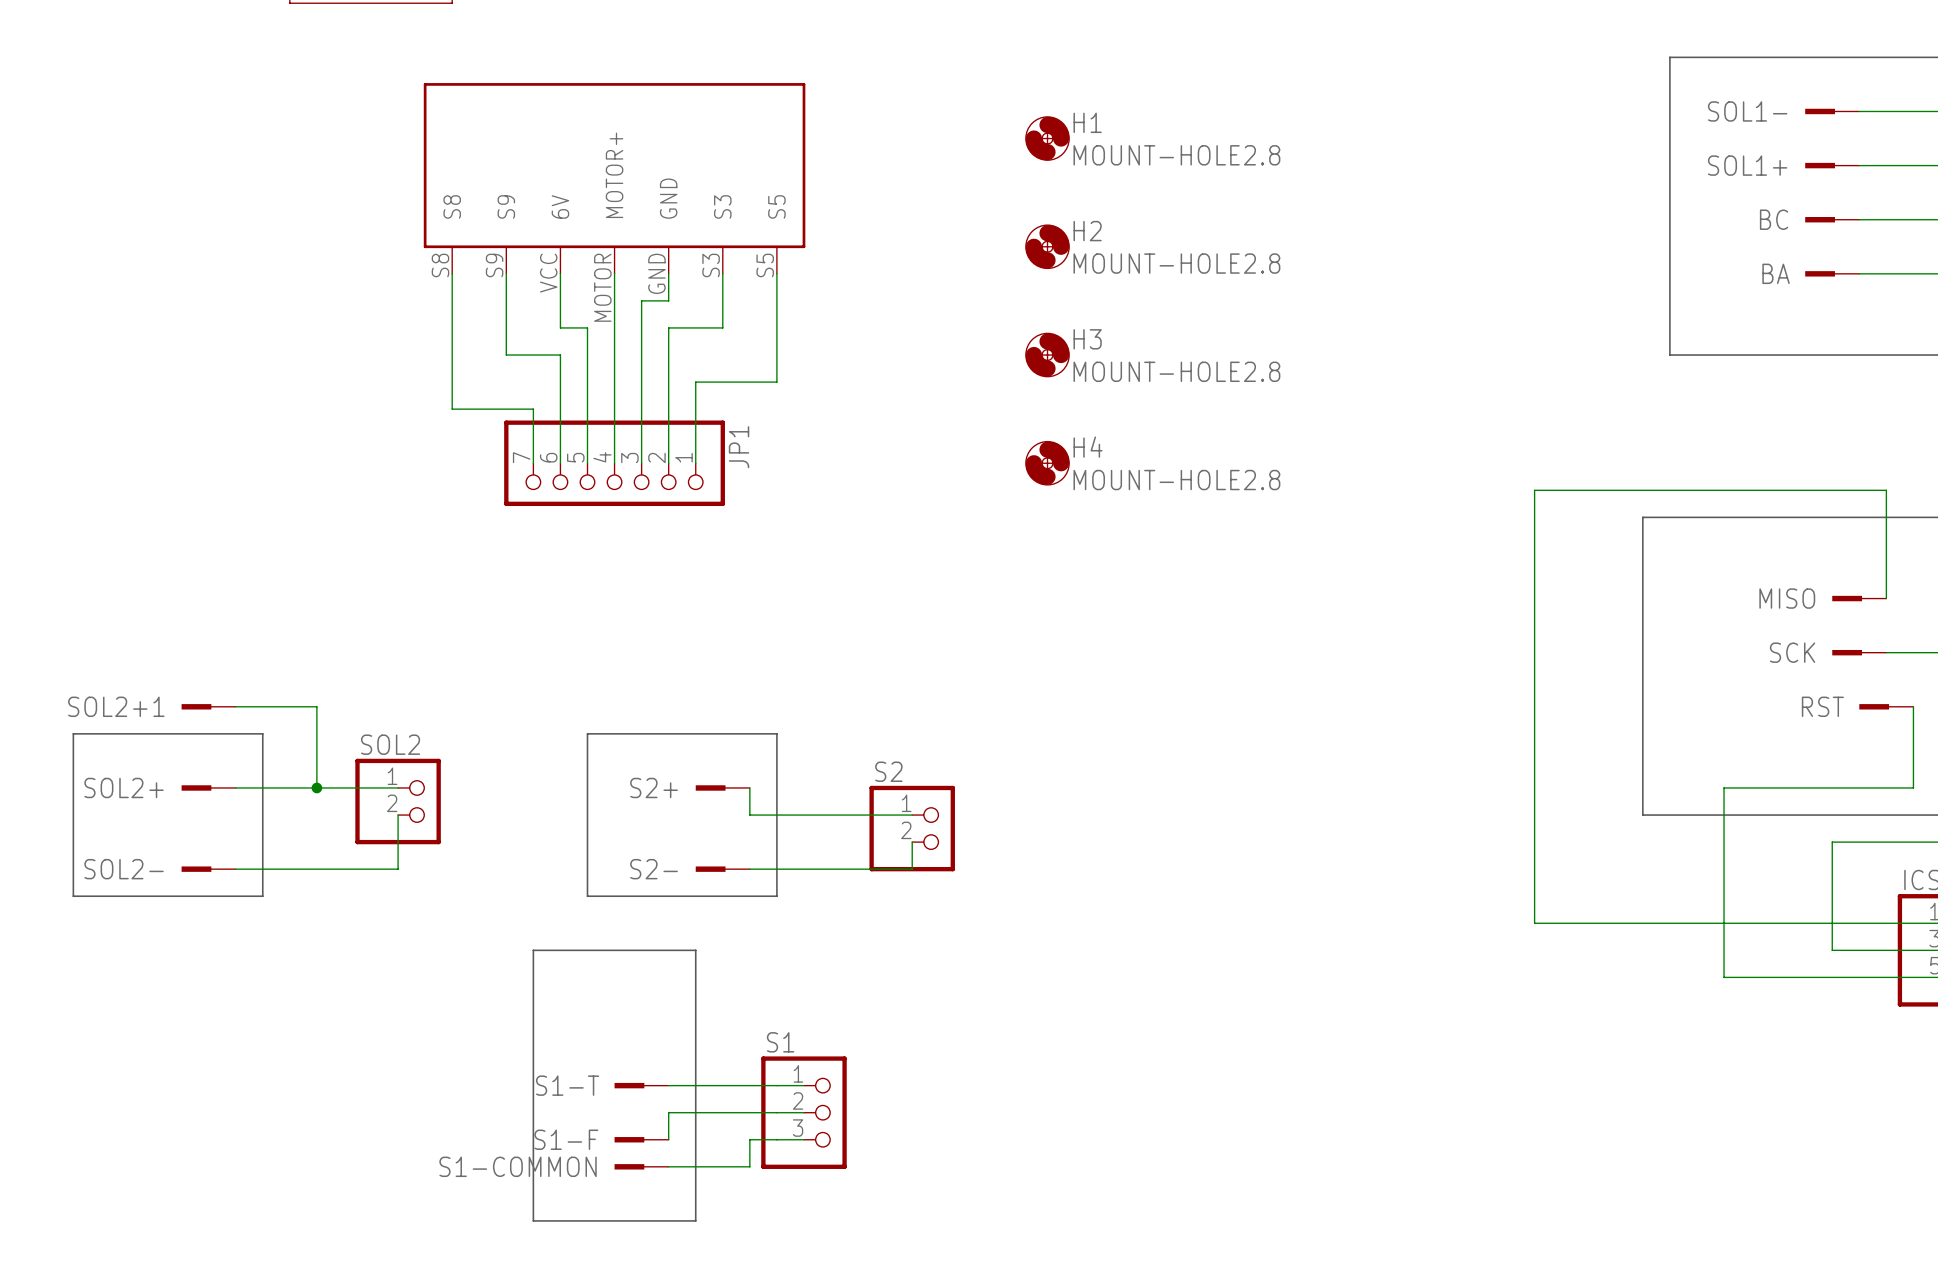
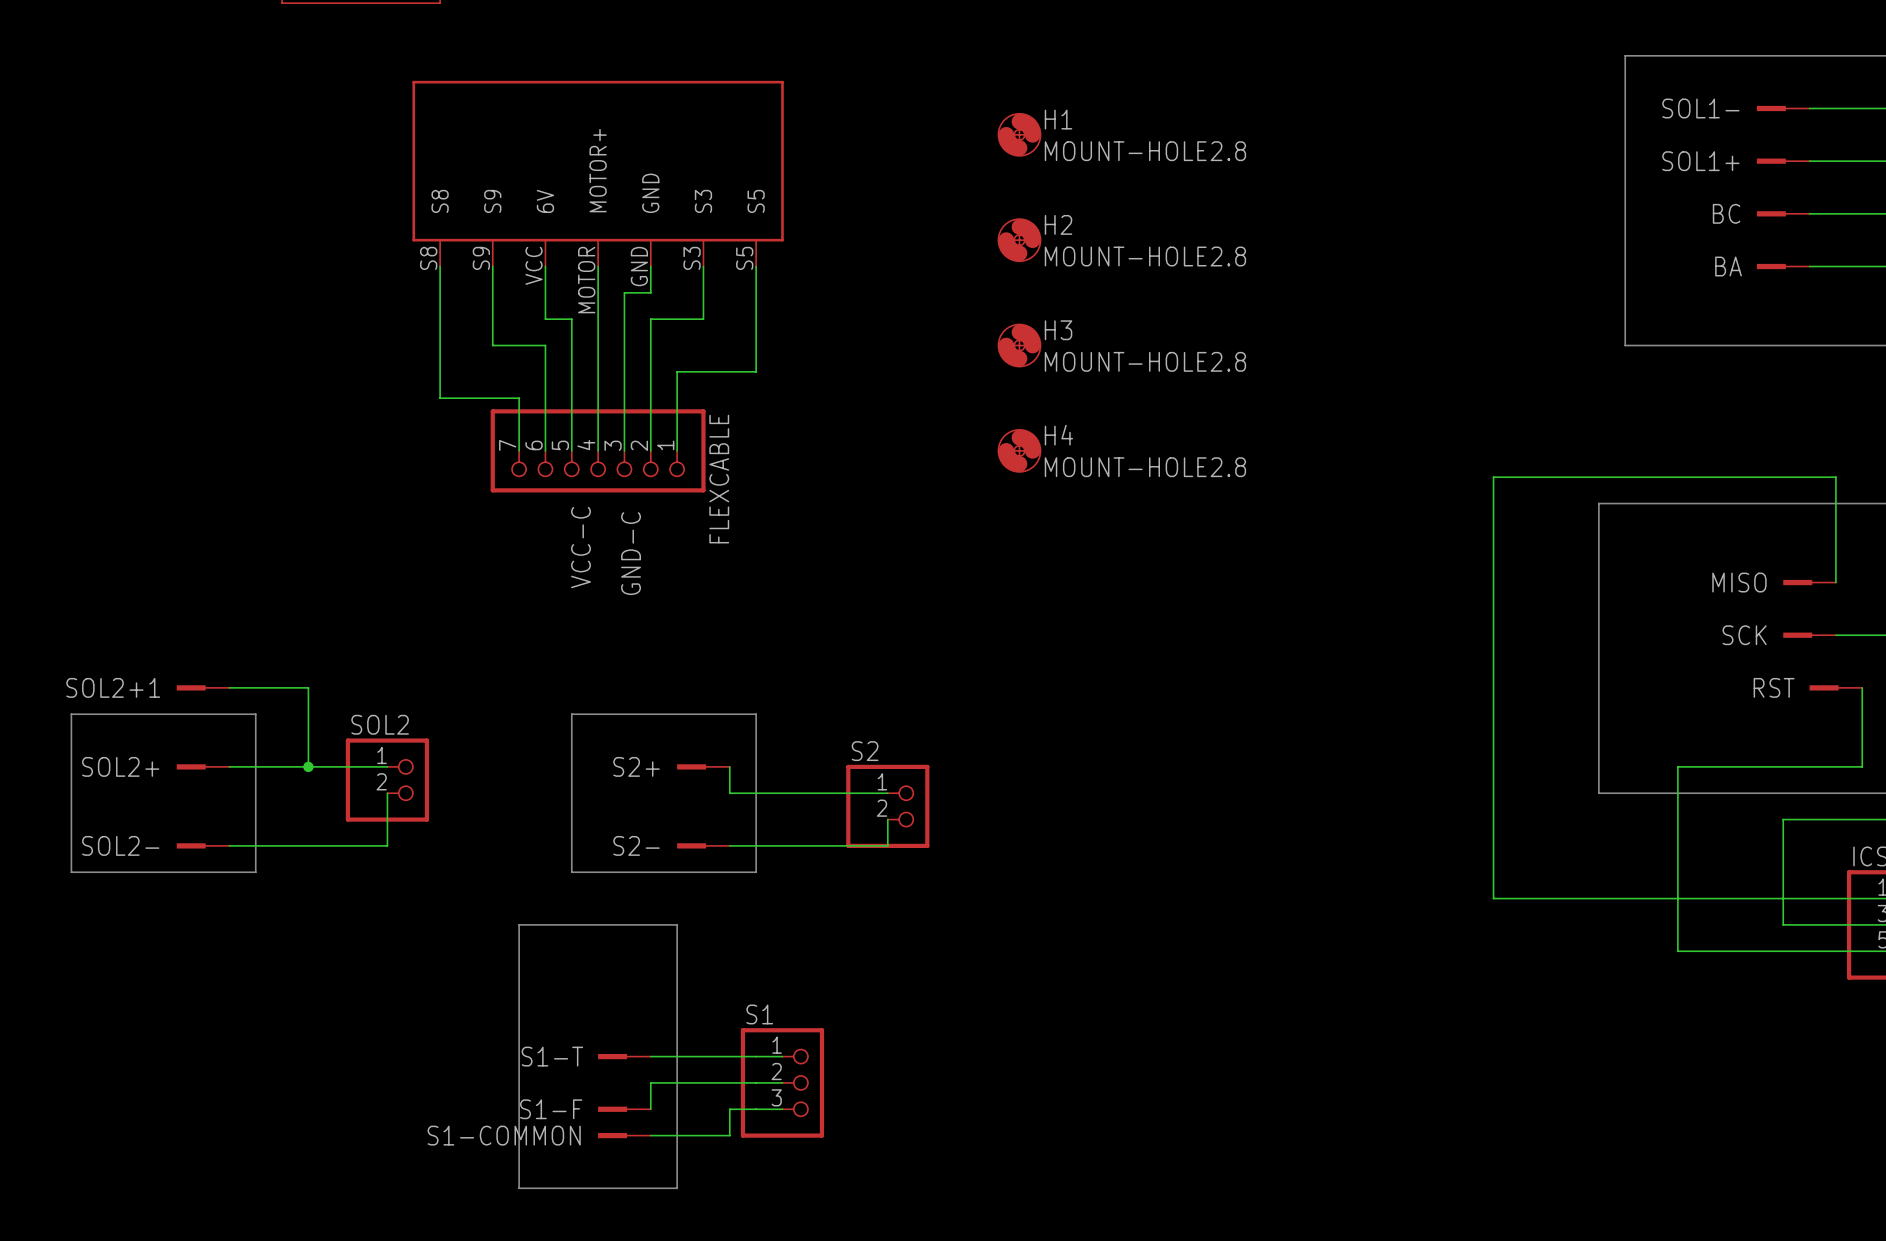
JP1 name: JP1 (739, 447) -> FLEXCABLE (719, 479)
label: none -> VCC-C (581, 547)
label: none -> GND-C (631, 553)

